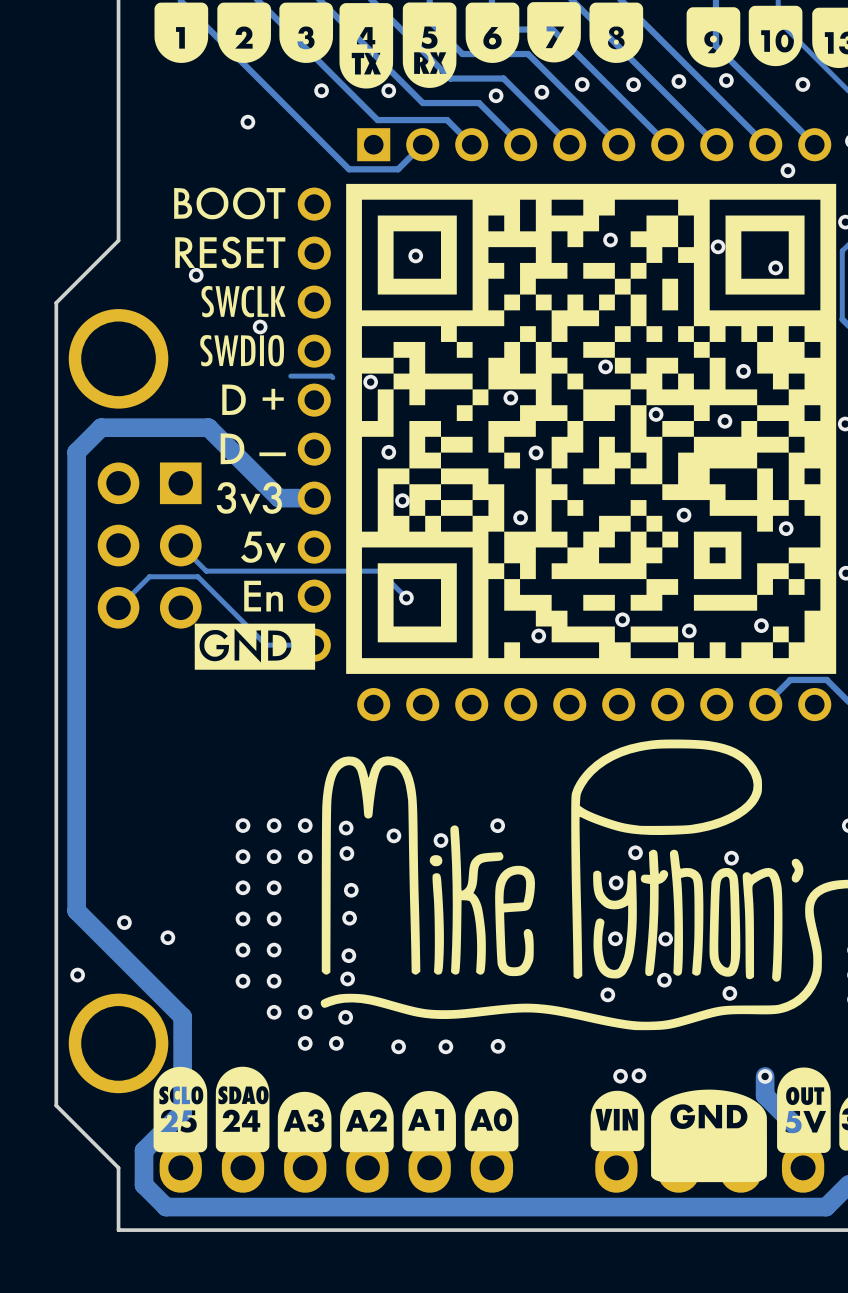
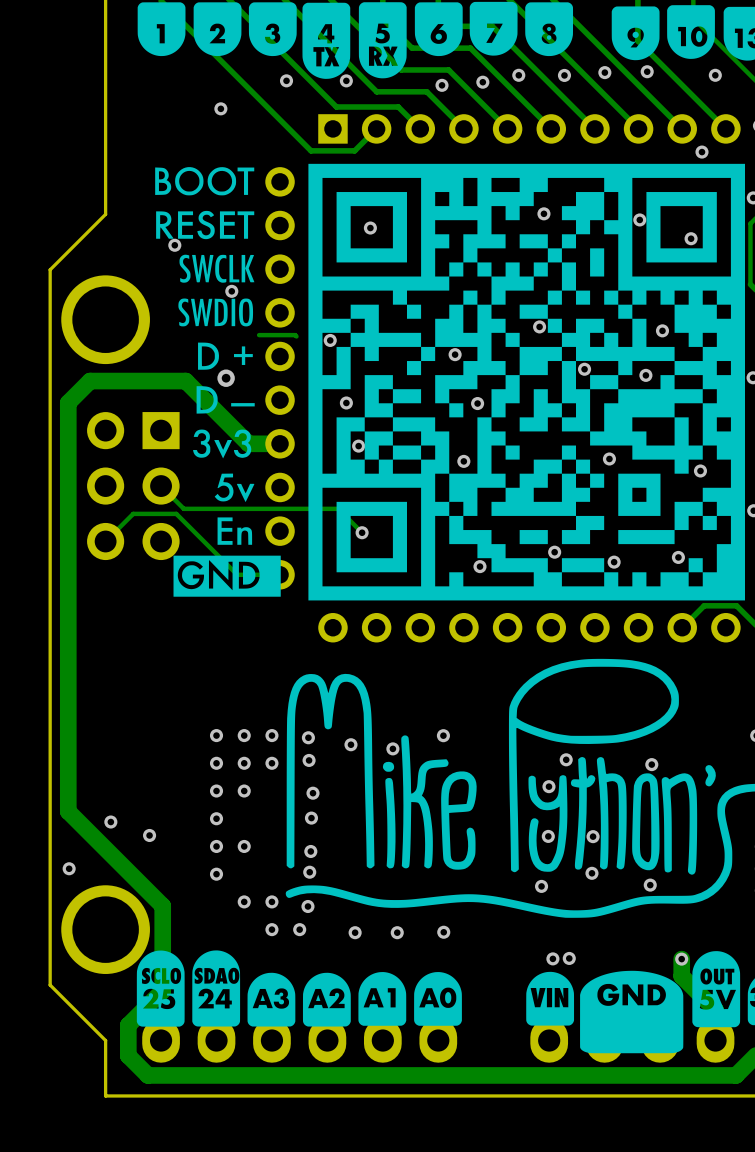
via: none -> (226, 378)
via: (274, 918) -> none
via: (274, 981) -> none

